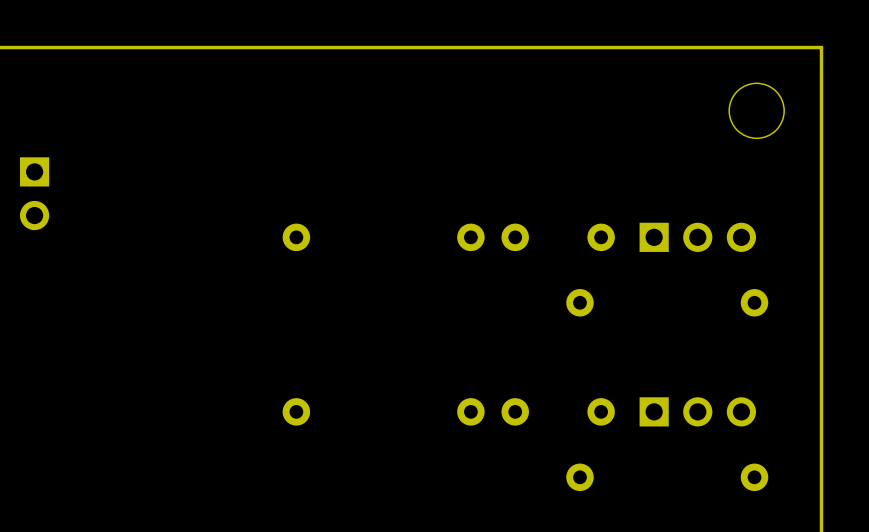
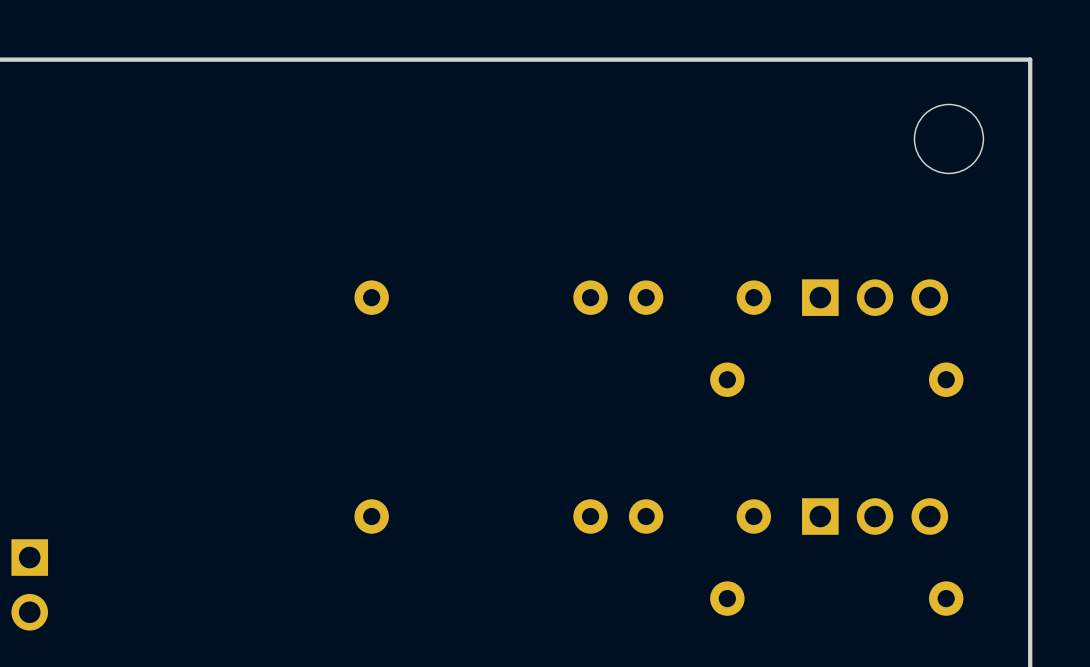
part position: (34, 193) -> (29, 584)

